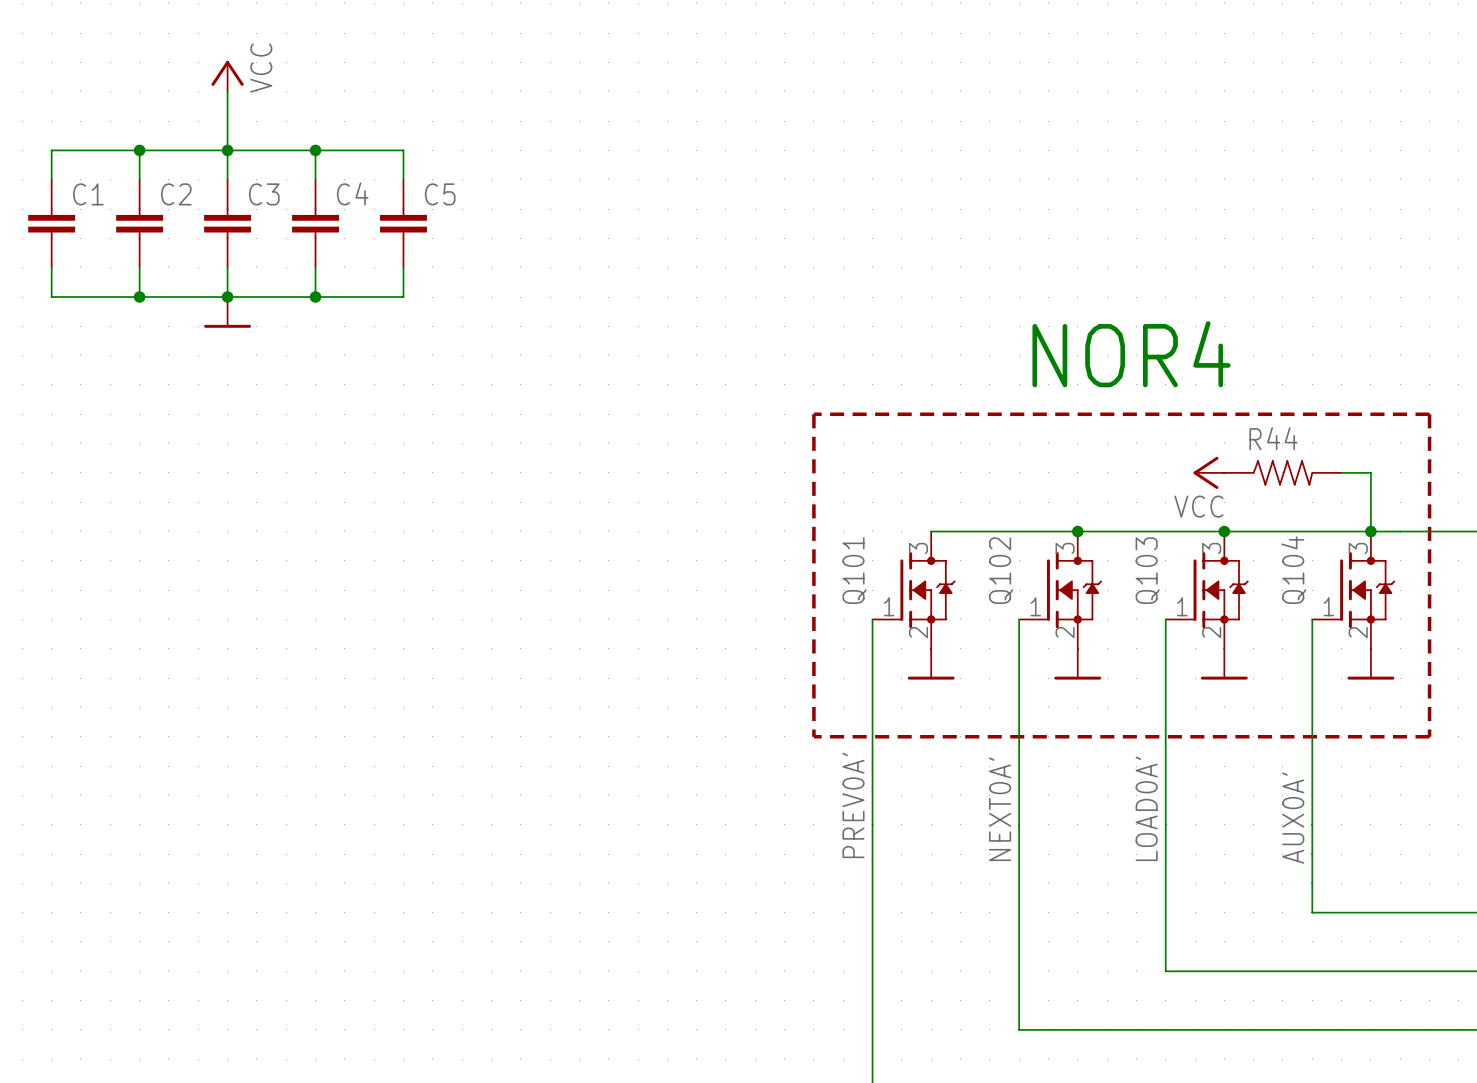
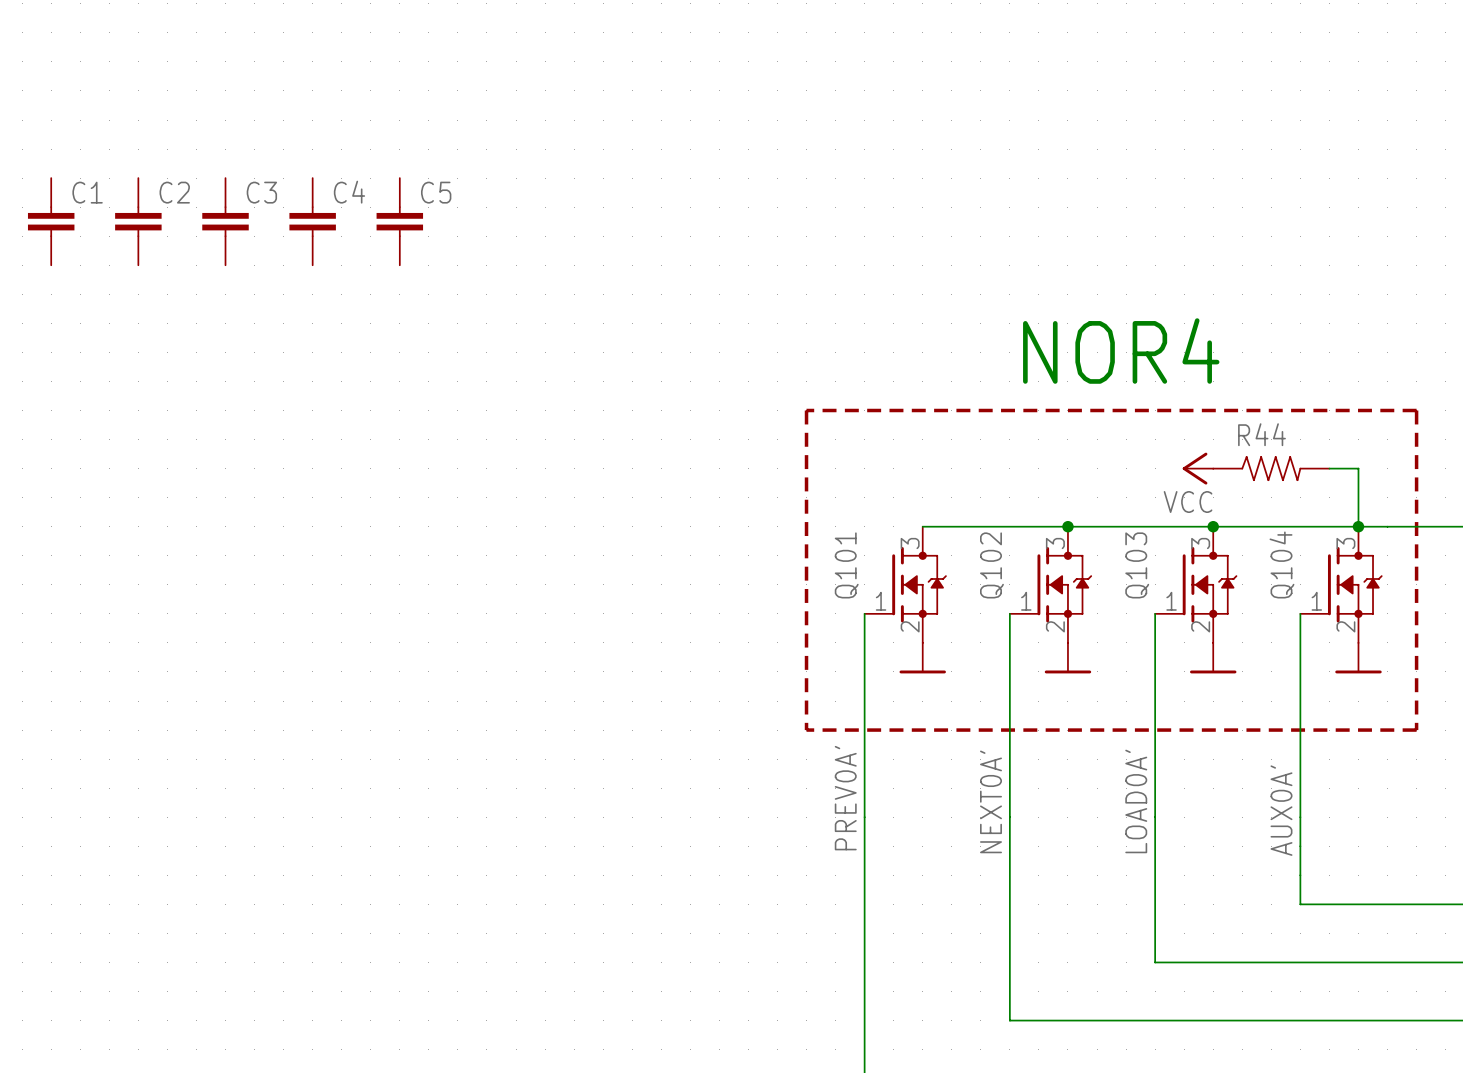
power symbol: VCC (227, 76) -> none
wire: (227, 91) (227, 179) -> none
wire: (139, 150) (139, 179) -> none
junction: (139, 150) -> none
junction: (227, 150) -> none
wire: (315, 150) (315, 179) -> none
junction: (315, 150) -> none
wire: (51, 179) (51, 150) (403, 150) (403, 179) -> none
wire: (51, 267) (51, 297) (403, 297) (403, 267) -> none
wire: (139, 267) (139, 297) -> none
wire: (227, 267) (227, 297) -> none
wire: (315, 267) (315, 297) -> none
junction: (139, 297) -> none
junction: (227, 297) -> none
junction: (315, 297) -> none
power symbol: (227, 312) -> none

